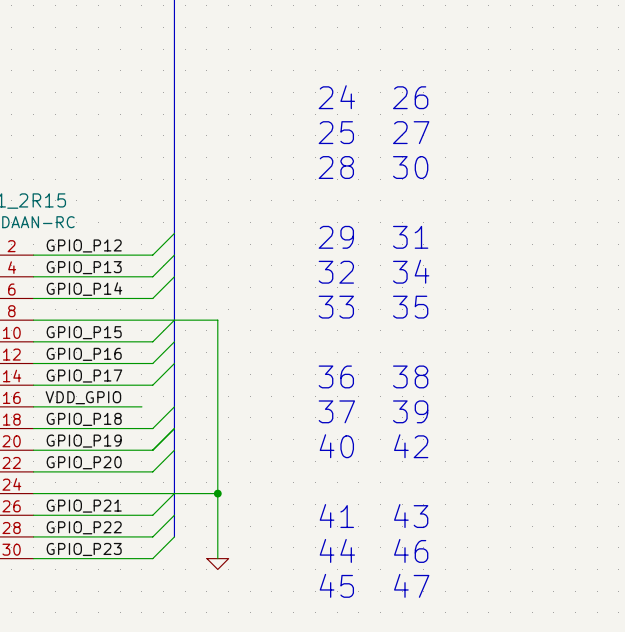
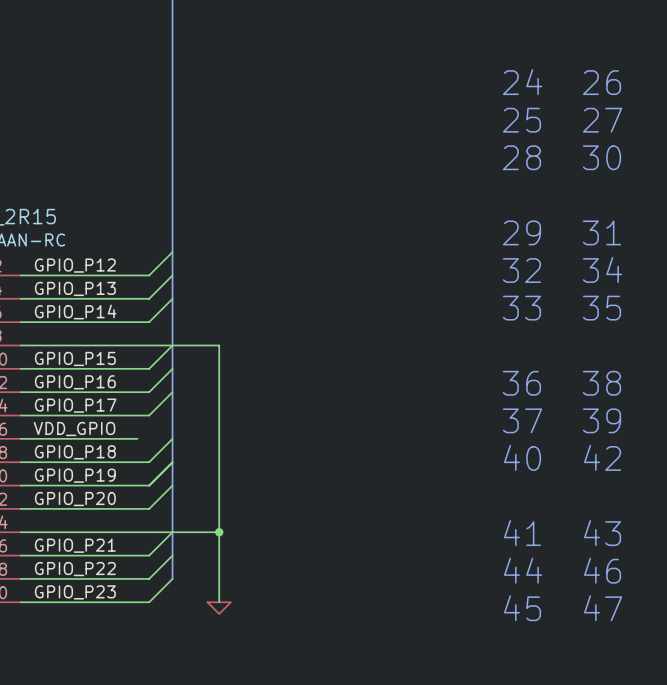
text position: 24 26 (373, 97) -> 24 26 (561, 82)
text position: 25 27 (374, 132) -> 25 27 (562, 120)
text position: 28 30 (373, 167) -> 28 30 (561, 157)
text position: 29 31 (373, 237) -> 29 31 (561, 232)
text position: 32 34 (374, 271) -> 32 34 (562, 269)
text position: 33 35 (373, 307) -> 33 35 (561, 308)
text position: 36 38 (373, 376) -> 36 38 (561, 383)
text position: 37 39 (373, 411) -> 37 39 (561, 420)
text position: 40 42 (374, 446) -> 40 42 (562, 457)
text position: 41 43 (374, 516) -> 41 43 (562, 533)
text position: 44 46 (374, 550) -> 44 46 (562, 570)
text position: 45 47 (374, 585) -> 45 47 (563, 608)

